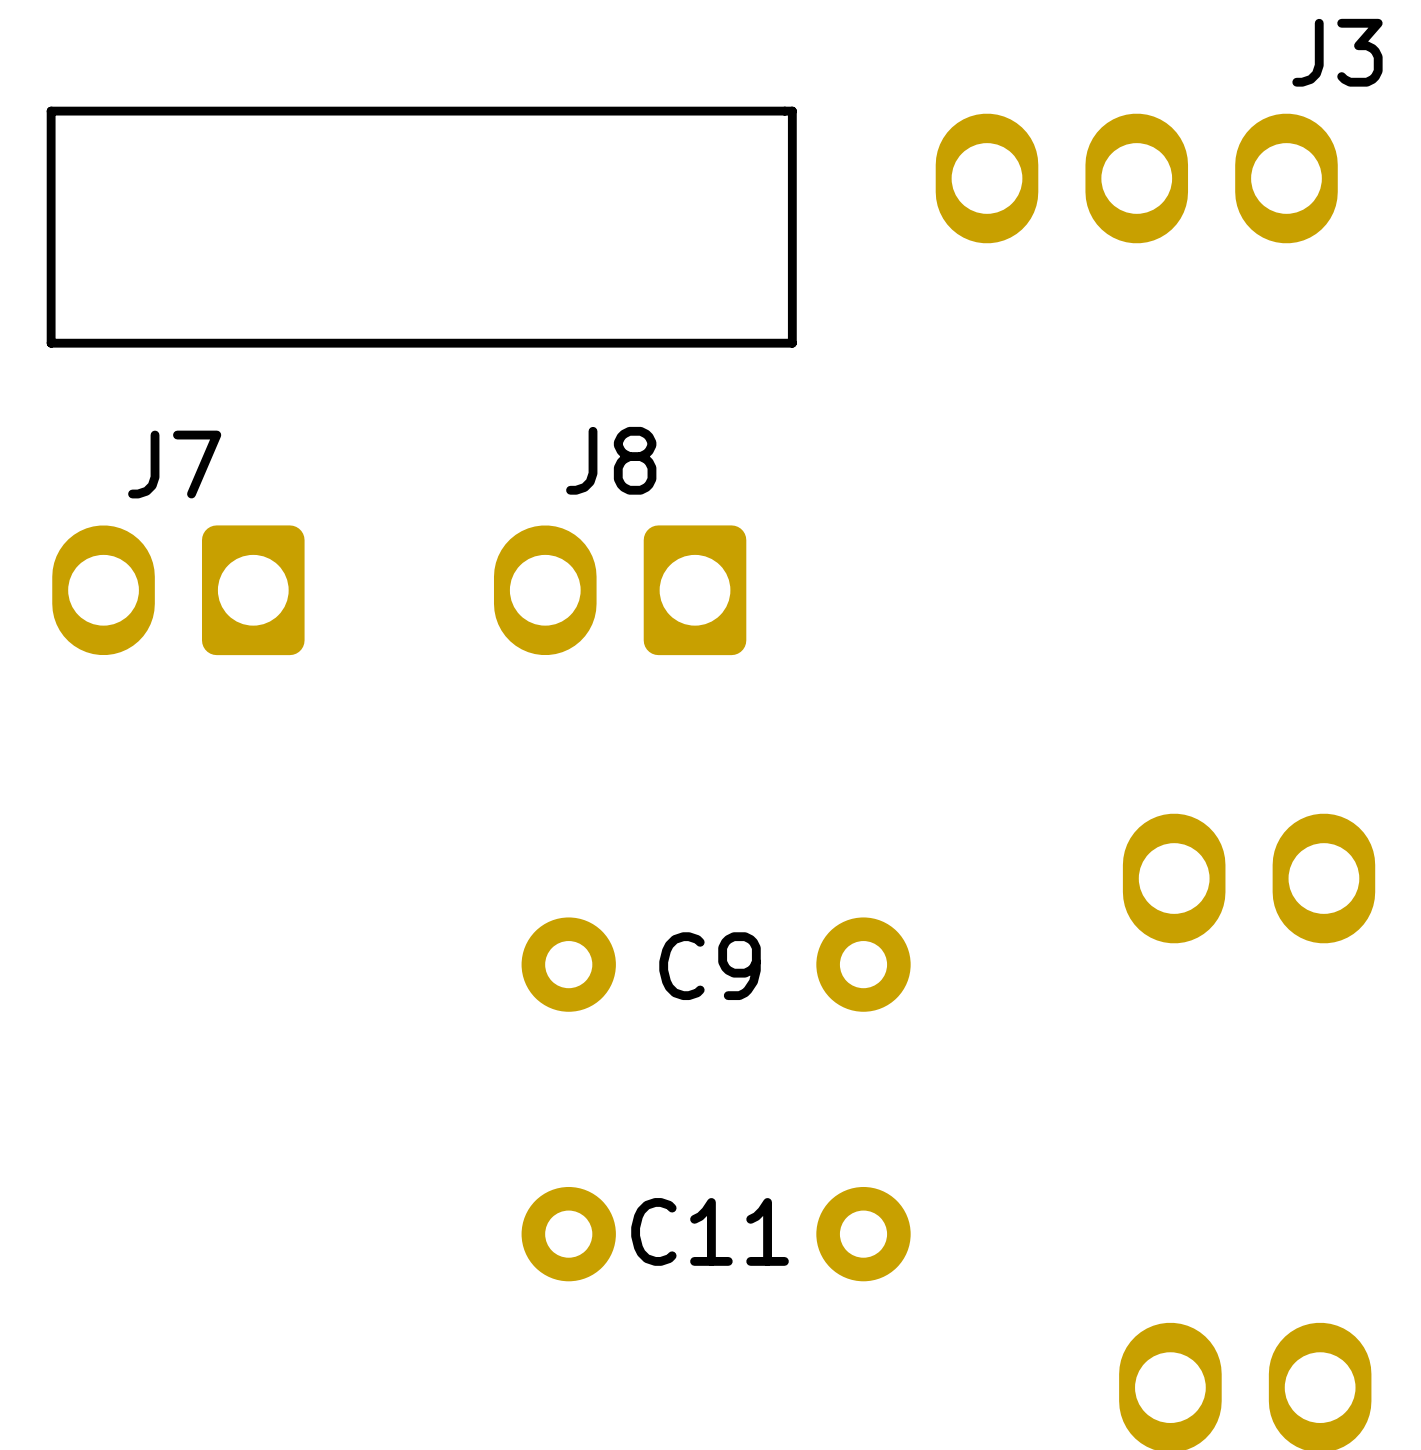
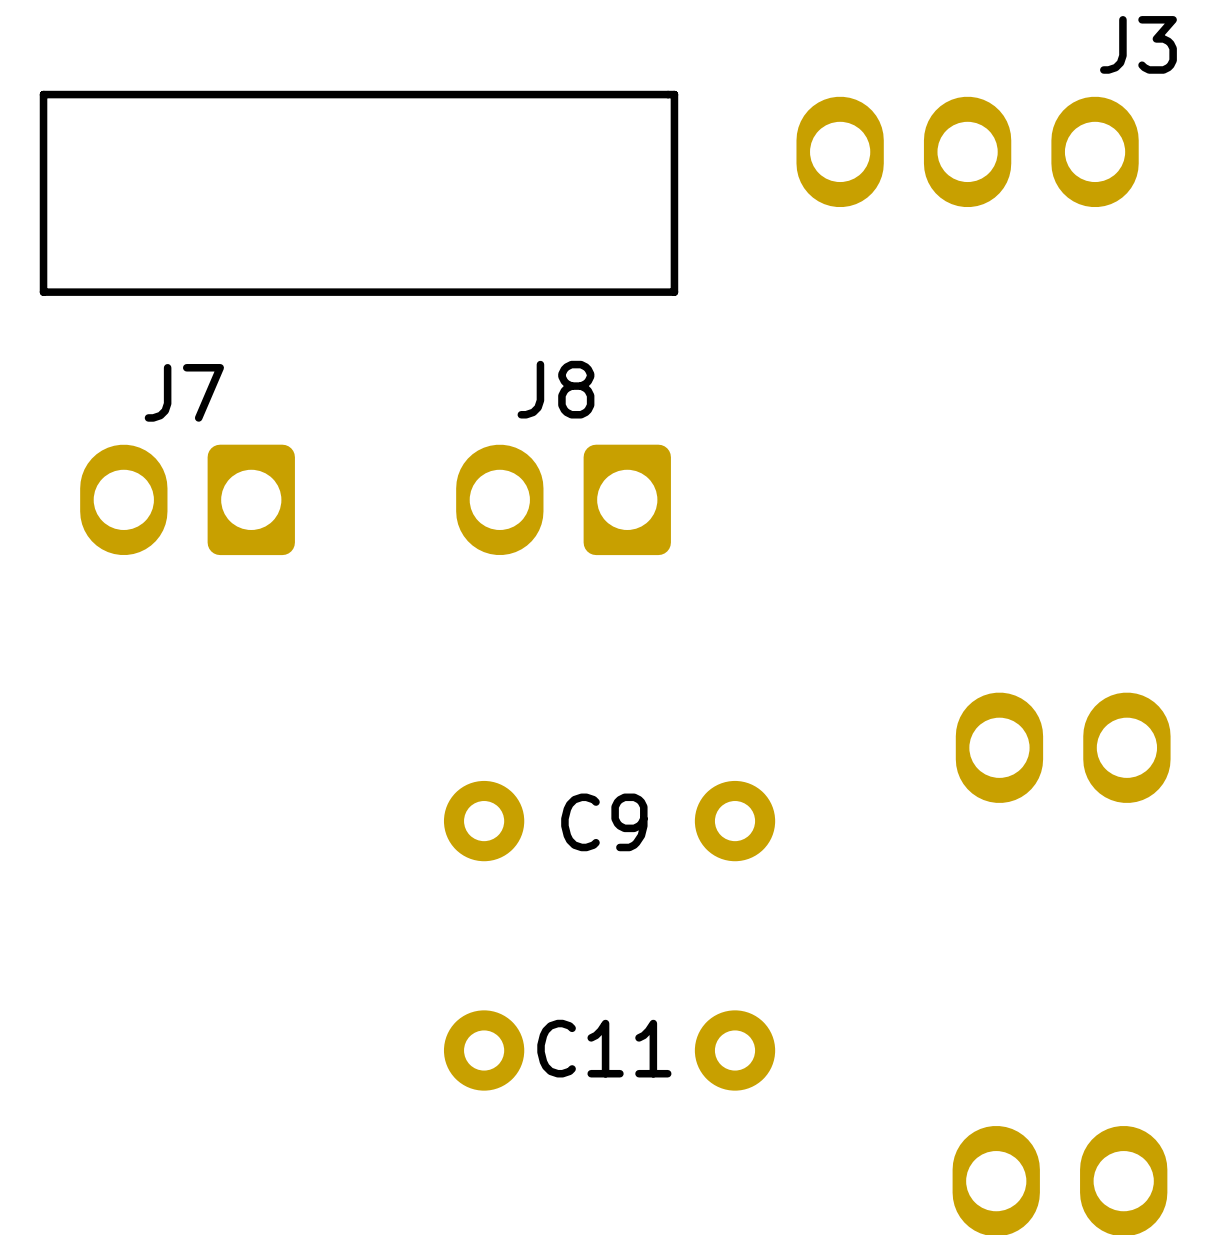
J7 position: (178, 590) -> (187, 499)
J8 position: (620, 590) -> (563, 499)

